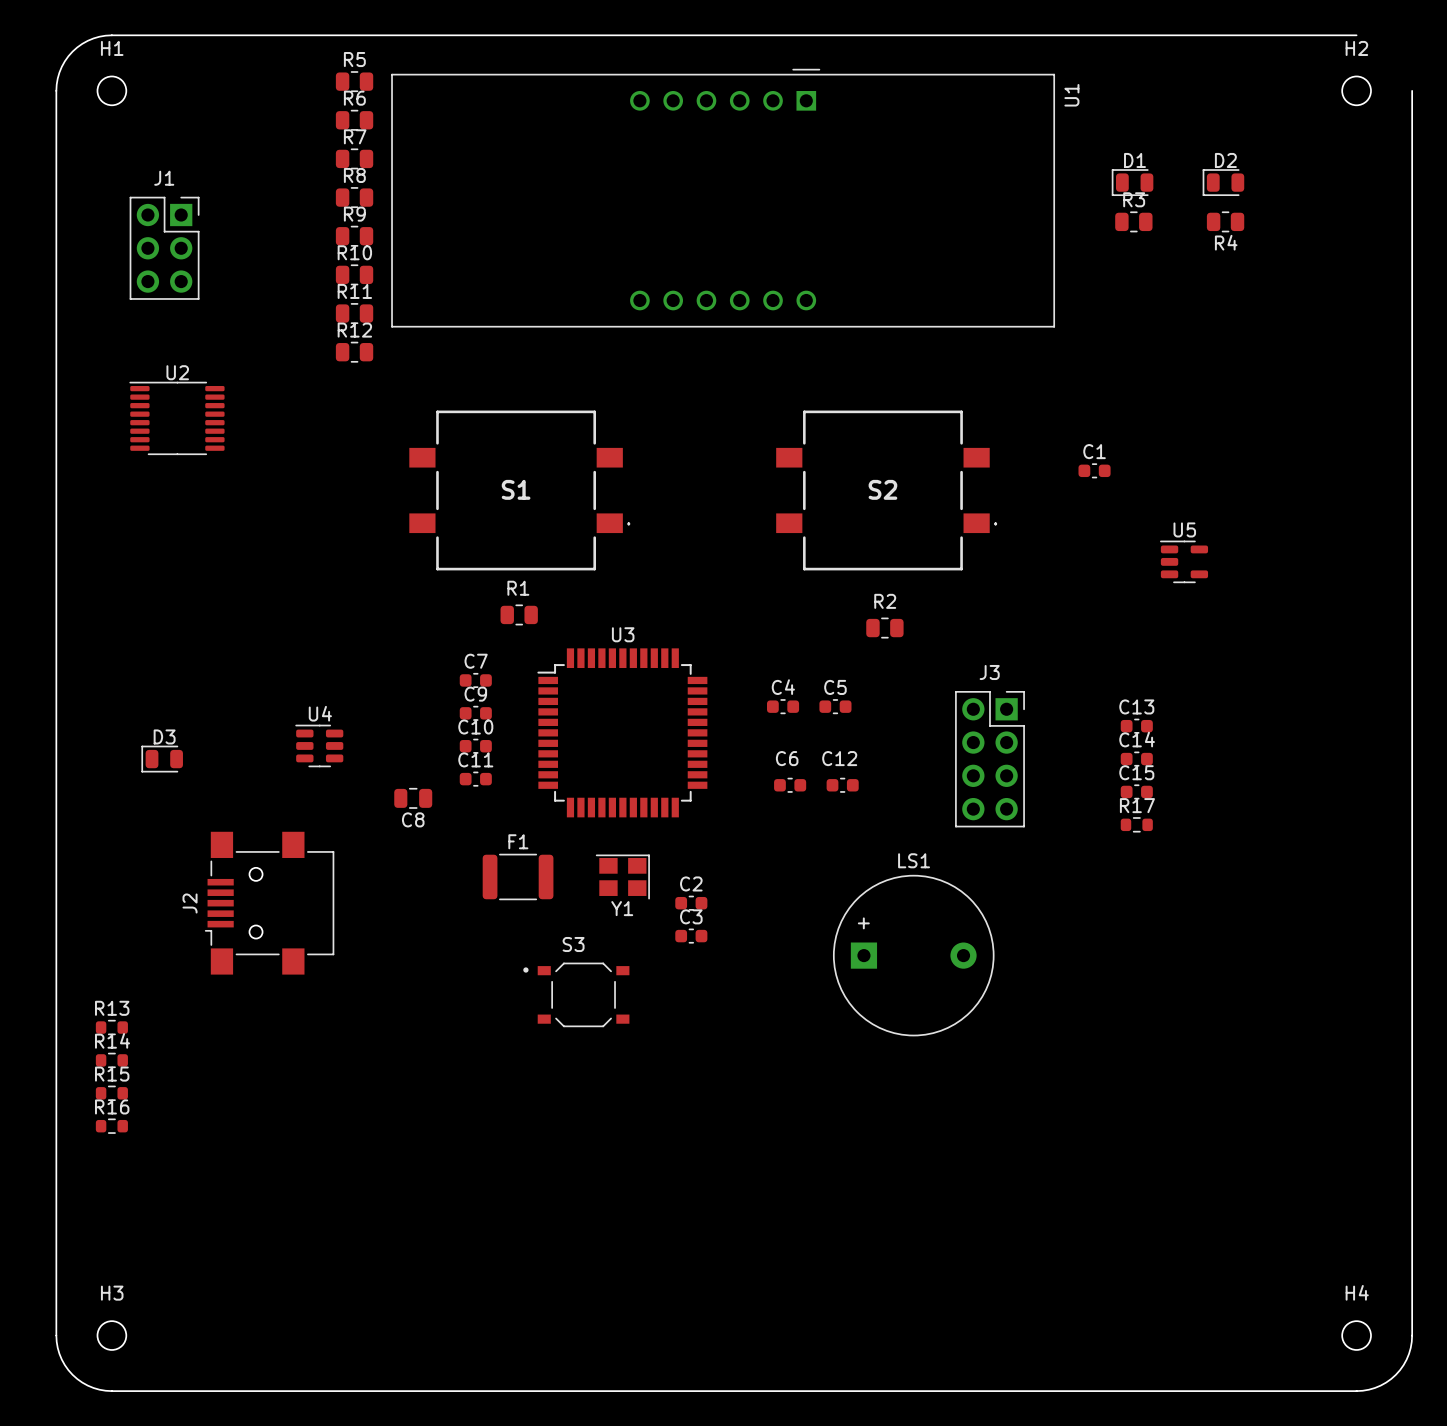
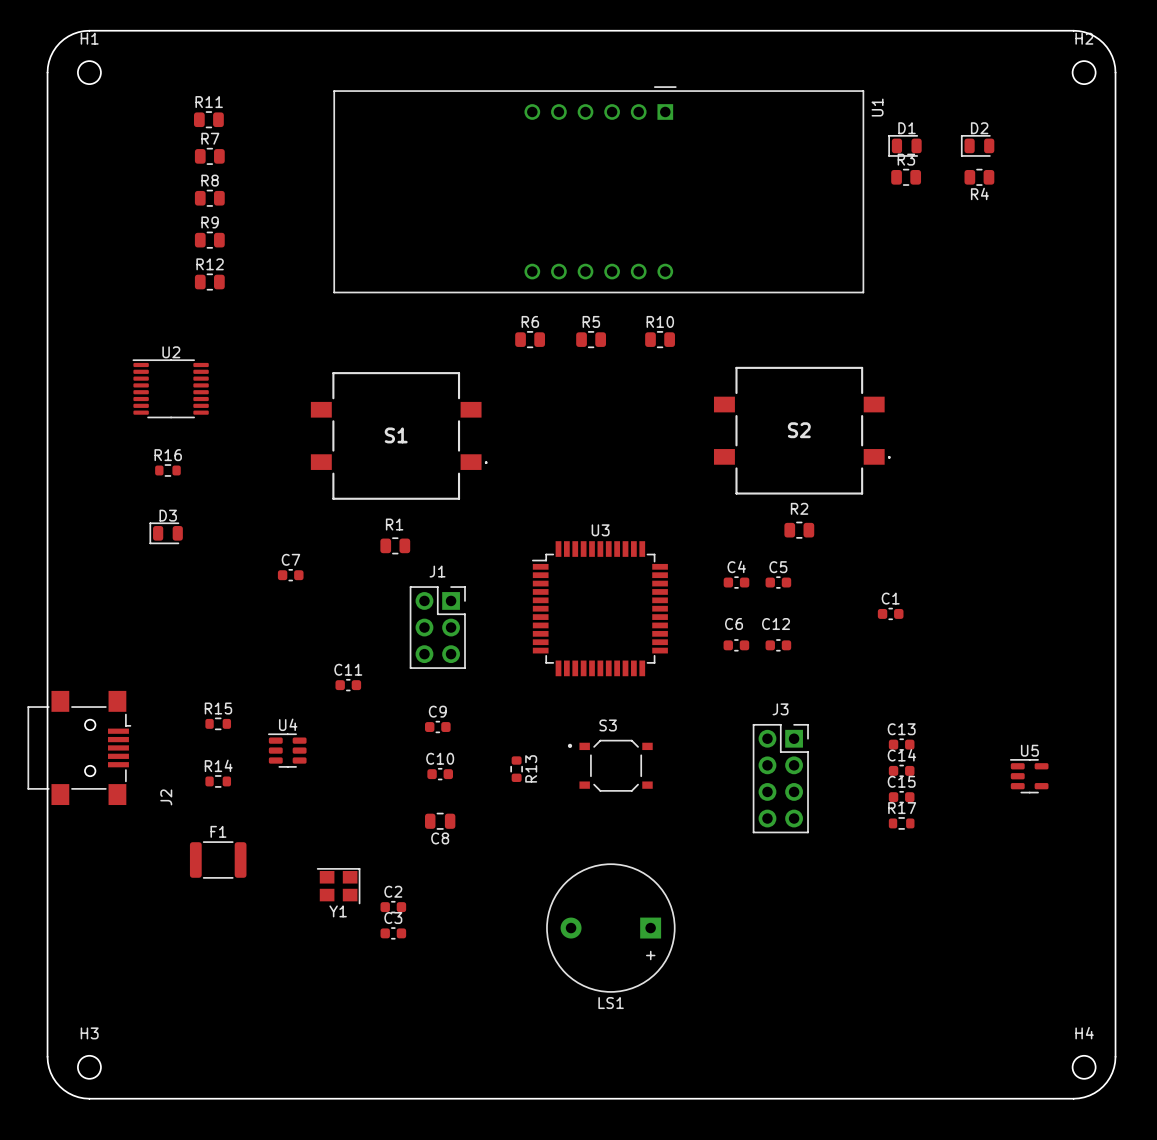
board edge: (1356, 35) (111, 35) (87, 40) (72, 51) (61, 66) (56, 90) (56, 1335) (59, 1353) (72, 1374) (87, 1385) (111, 1391) (1356, 1391) (1380, 1385) (1395, 1374) (1406, 1359) (1412, 1335) (1412, 90) -> none
board edge: none -> (89, 30) (1073, 30) (1089, 33) (1103, 43) (1112, 56) (1115, 72) (1115, 1056) (1112, 1072) (1103, 1086) (1089, 1095) (1073, 1098) (89, 1098) (73, 1095) (59, 1086) (50, 1072) (47, 1056) (47, 72) (50, 56) (59, 43) (73, 33) (89, 30)
R5 position: (354, 81) -> (591, 339)
R6 position: (354, 120) -> (530, 339)
R7 position: (354, 158) -> (209, 156)
R8 position: (354, 197) -> (209, 198)
U1 position: (723, 198) -> (598, 189)
R9 position: (354, 236) -> (209, 240)
J1 position: (164, 248) -> (437, 627)
R10 position: (354, 274) -> (660, 339)
R11 position: (354, 313) -> (208, 119)
R12 position: (354, 352) -> (209, 282)
U2 position: (177, 418) -> (170, 388)
C1 position: (1094, 470) -> (890, 613)
S1 position: (519, 490) -> (399, 435)
S2 position: (886, 490) -> (802, 430)
U5 position: (1184, 561) -> (1029, 776)
R1 position: (519, 614) -> (395, 545)
R2 position: (884, 628) -> (799, 530)
C7 position: (475, 680) -> (290, 575)
C4 position: (783, 706) -> (736, 582)
C5 position: (835, 706) -> (778, 582)
C9 position: (475, 713) -> (437, 727)
C13 position: (1136, 726) -> (901, 744)
U3 position: (622, 732) -> (599, 608)
U4 position: (319, 745) -> (287, 750)
C10 position: (475, 746) -> (440, 774)
D3 position: (162, 759) -> (166, 533)
J3 position: (989, 759) -> (780, 778)
C14 position: (1136, 759) -> (901, 770)
C11 position: (475, 779) -> (348, 685)
C6 position: (790, 785) -> (736, 645)
C12 position: (842, 785) -> (778, 645)
C15 position: (1136, 791) -> (901, 797)
C8 position: (413, 798) -> (440, 821)
R17 position: (1136, 824) -> (901, 823)
F1 position: (518, 876) -> (218, 859)
Y1 position: (622, 876) -> (338, 886)
J2 name position: J2 (190, 903) -> J2 (166, 797)
J2 rotation: 0° (269, 903) -> 180° (79, 747)
J2 position: (269, 903) -> (79, 747)
C2 position: (691, 903) -> (393, 907)
C3 position: (691, 936) -> (393, 933)
LS1 rotation: 0° (913, 955) -> 180° (610, 928)
LS1 position: (913, 955) -> (610, 928)
S3 position: (576, 994) -> (610, 765)
R13 rotation: 0° (111, 1027) -> 90° clockwise (516, 769)
R13 position: (111, 1027) -> (516, 769)
R14 position: (111, 1060) -> (218, 781)
R15 position: (111, 1093) -> (218, 723)
R16 position: (111, 1126) -> (167, 470)

